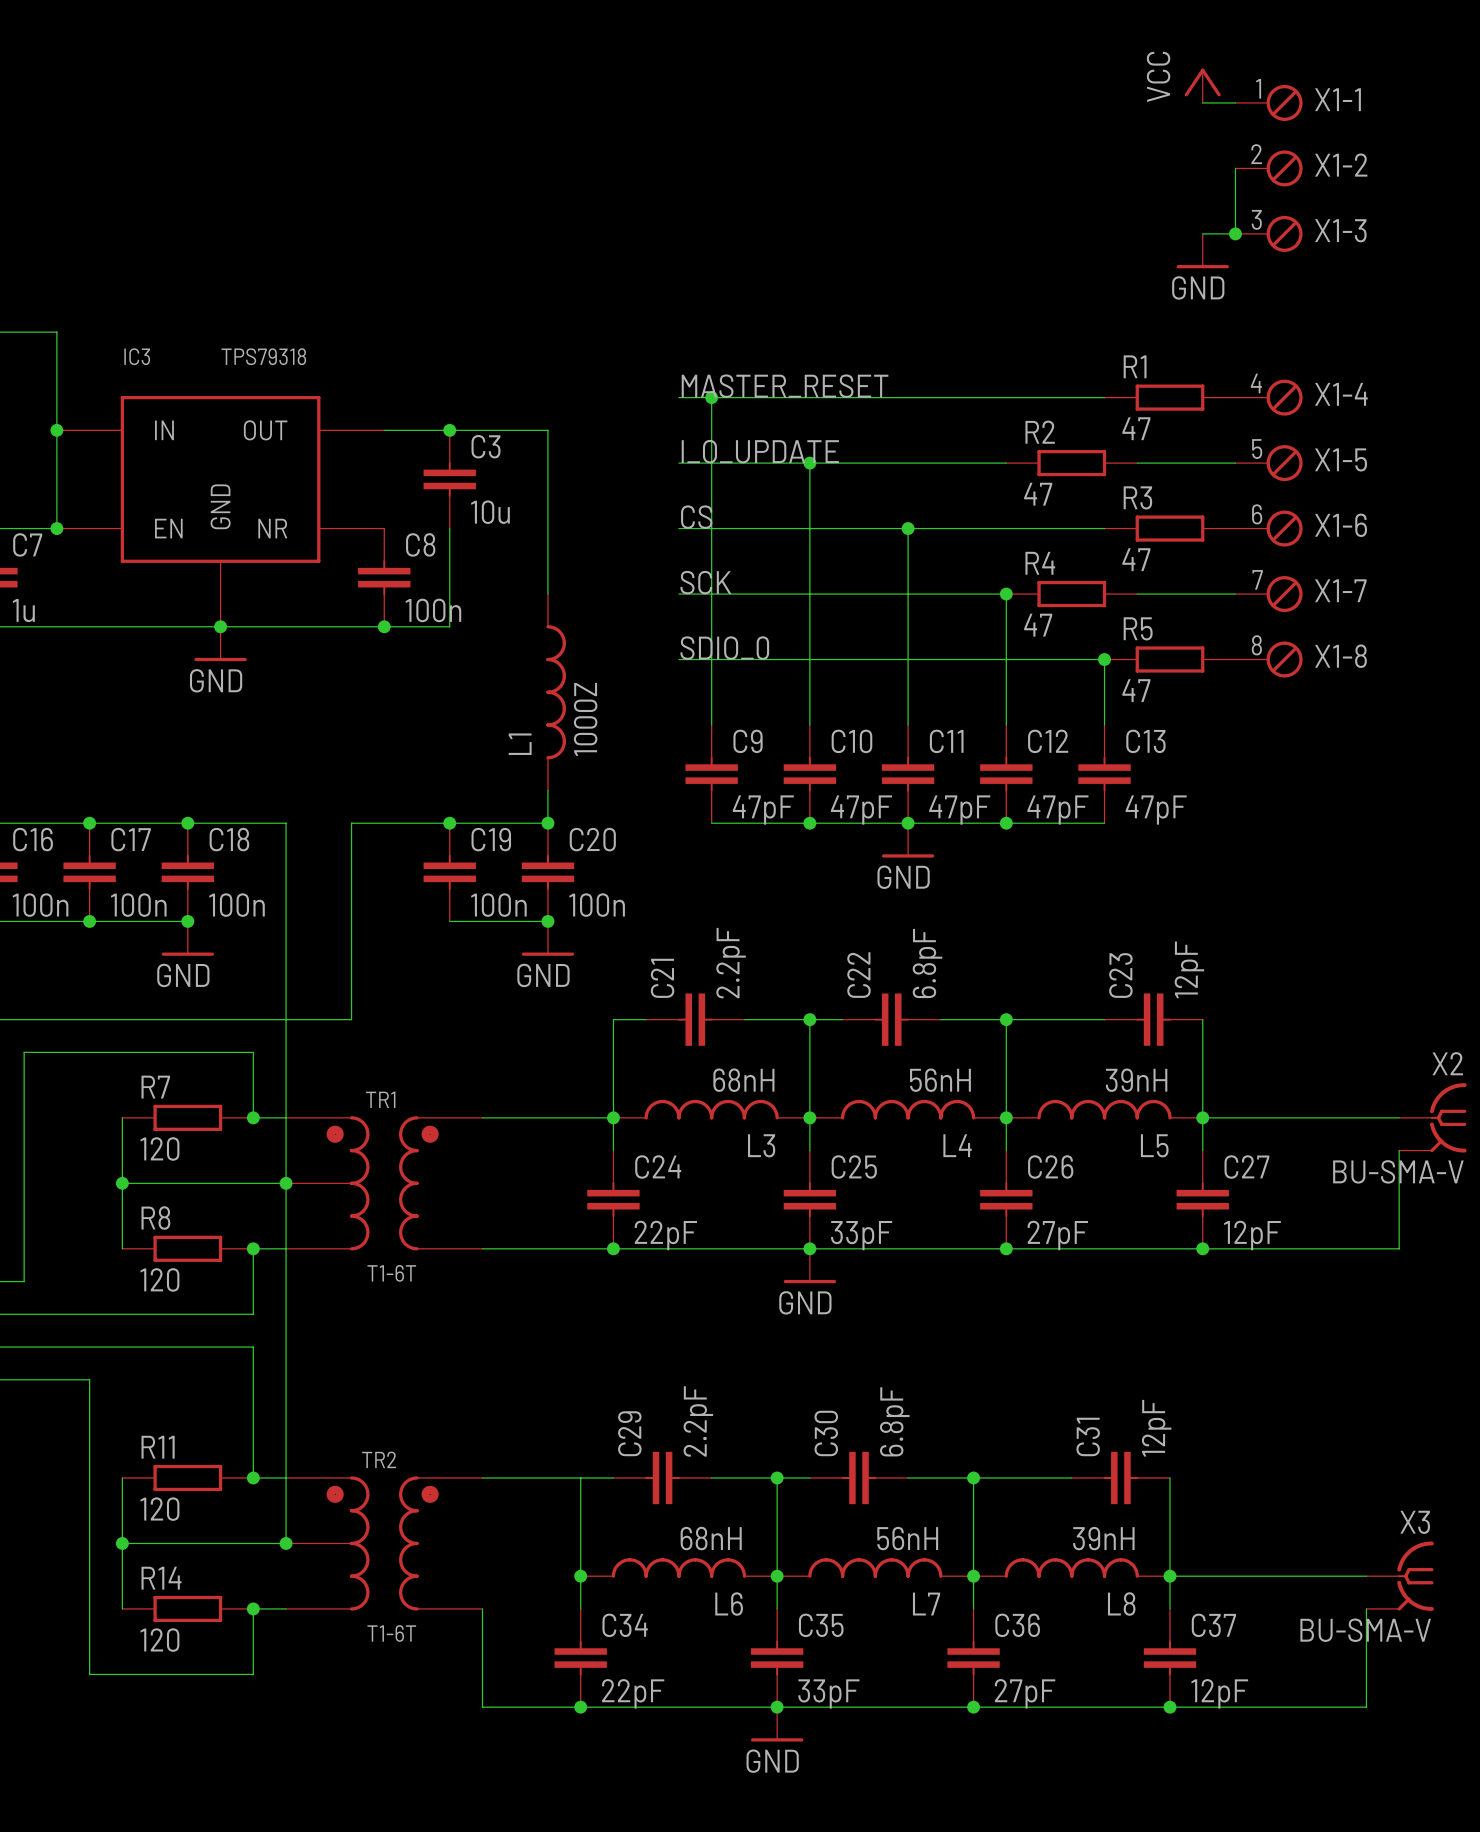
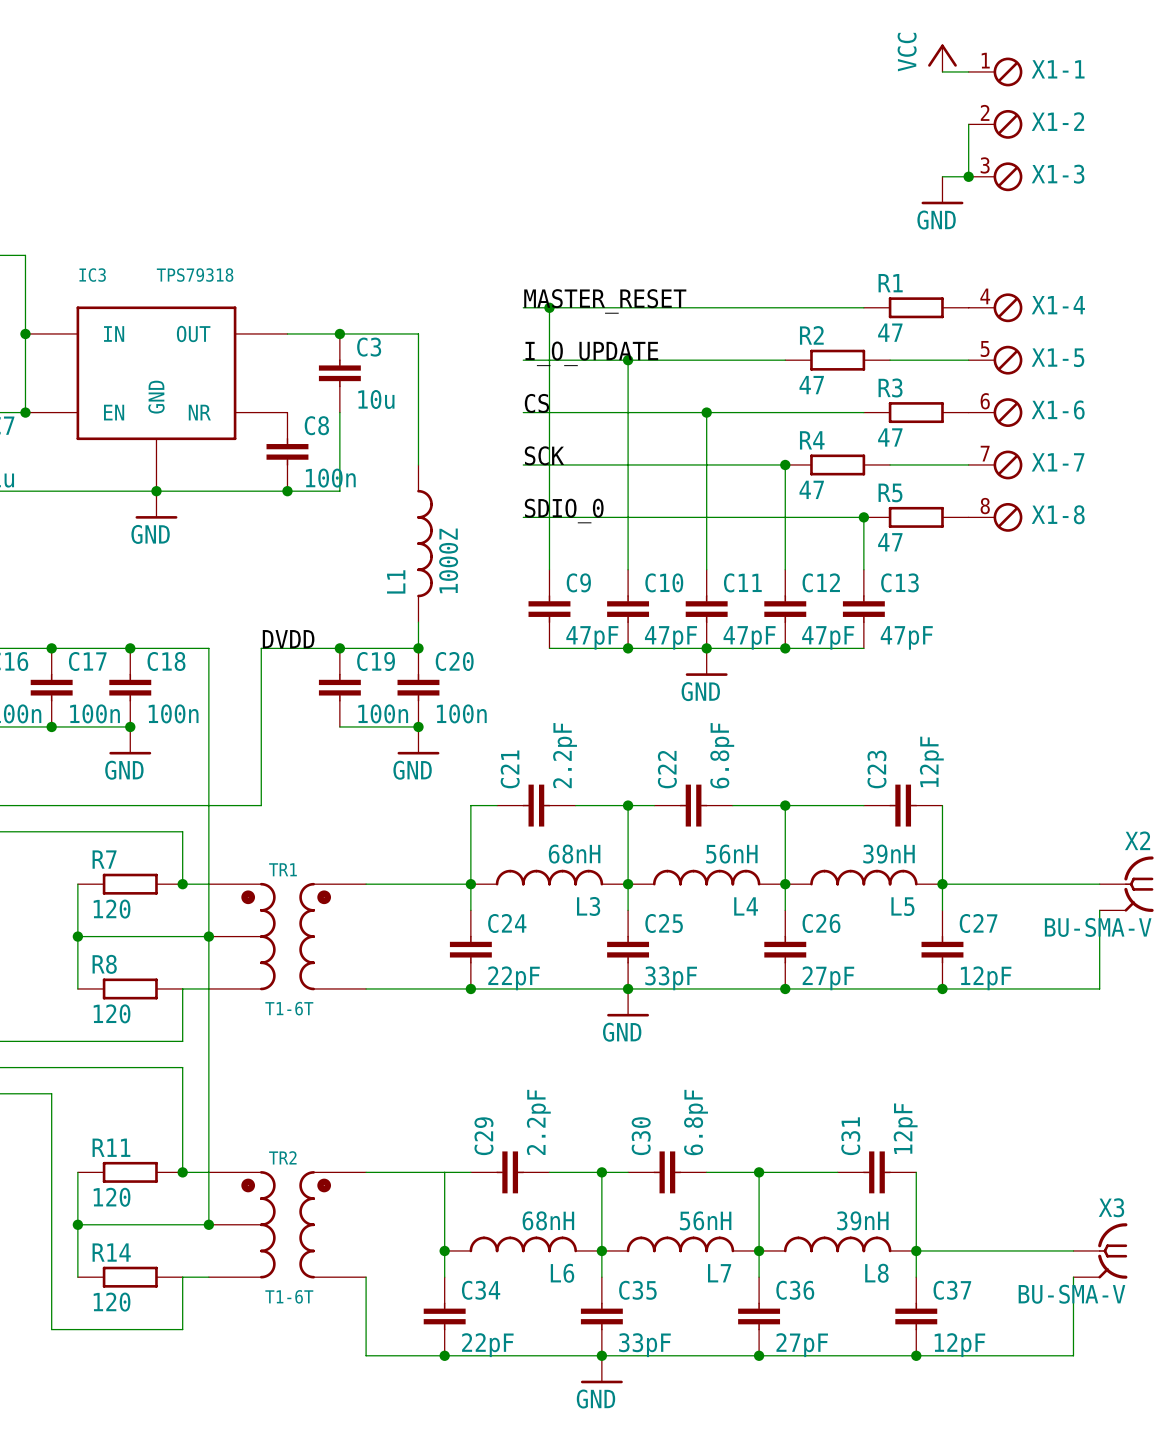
label: none -> DVDD (288, 639)
junction: (253, 1248) -> none
junction: (253, 1608) -> none

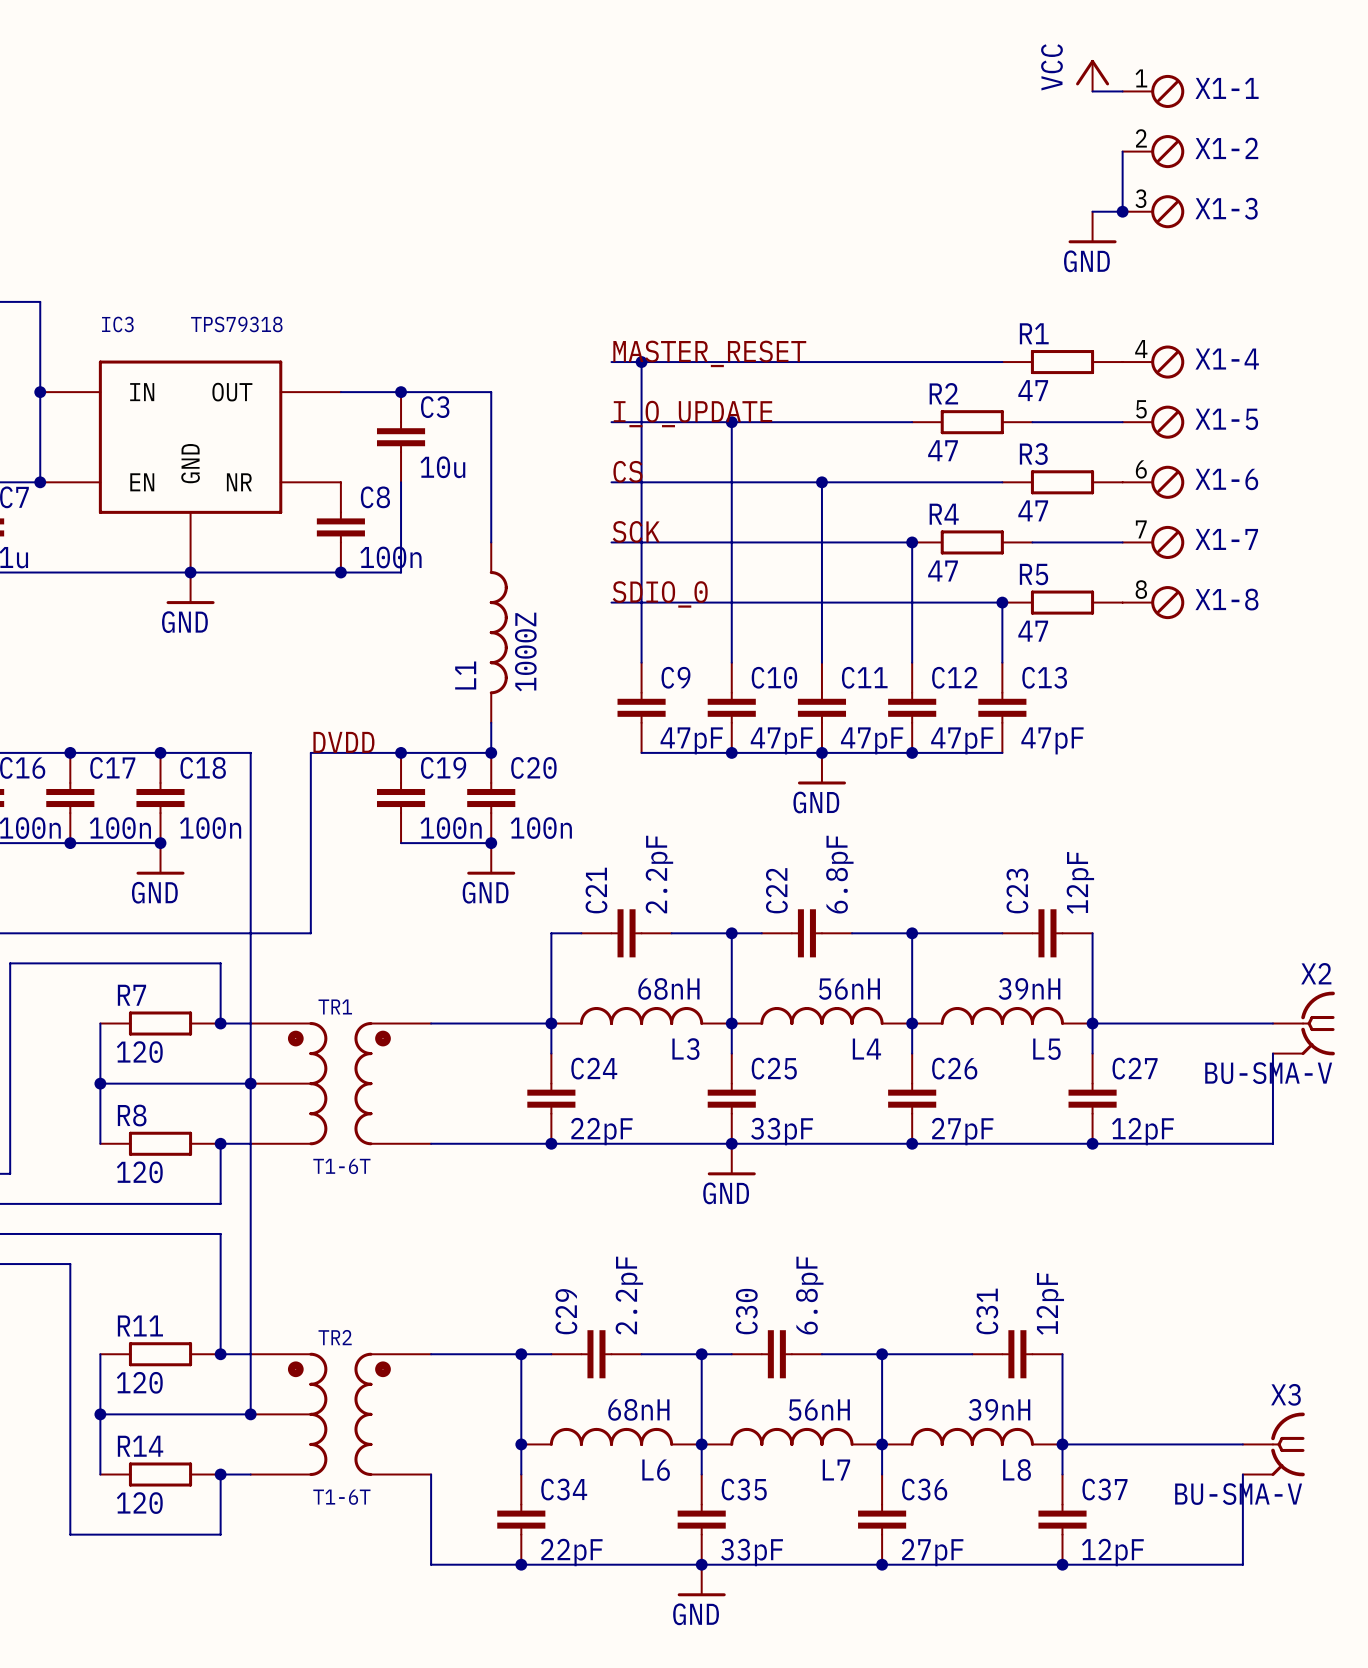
junction: none -> (220, 1143)
junction: none -> (521, 1354)
junction: none -> (220, 1474)

